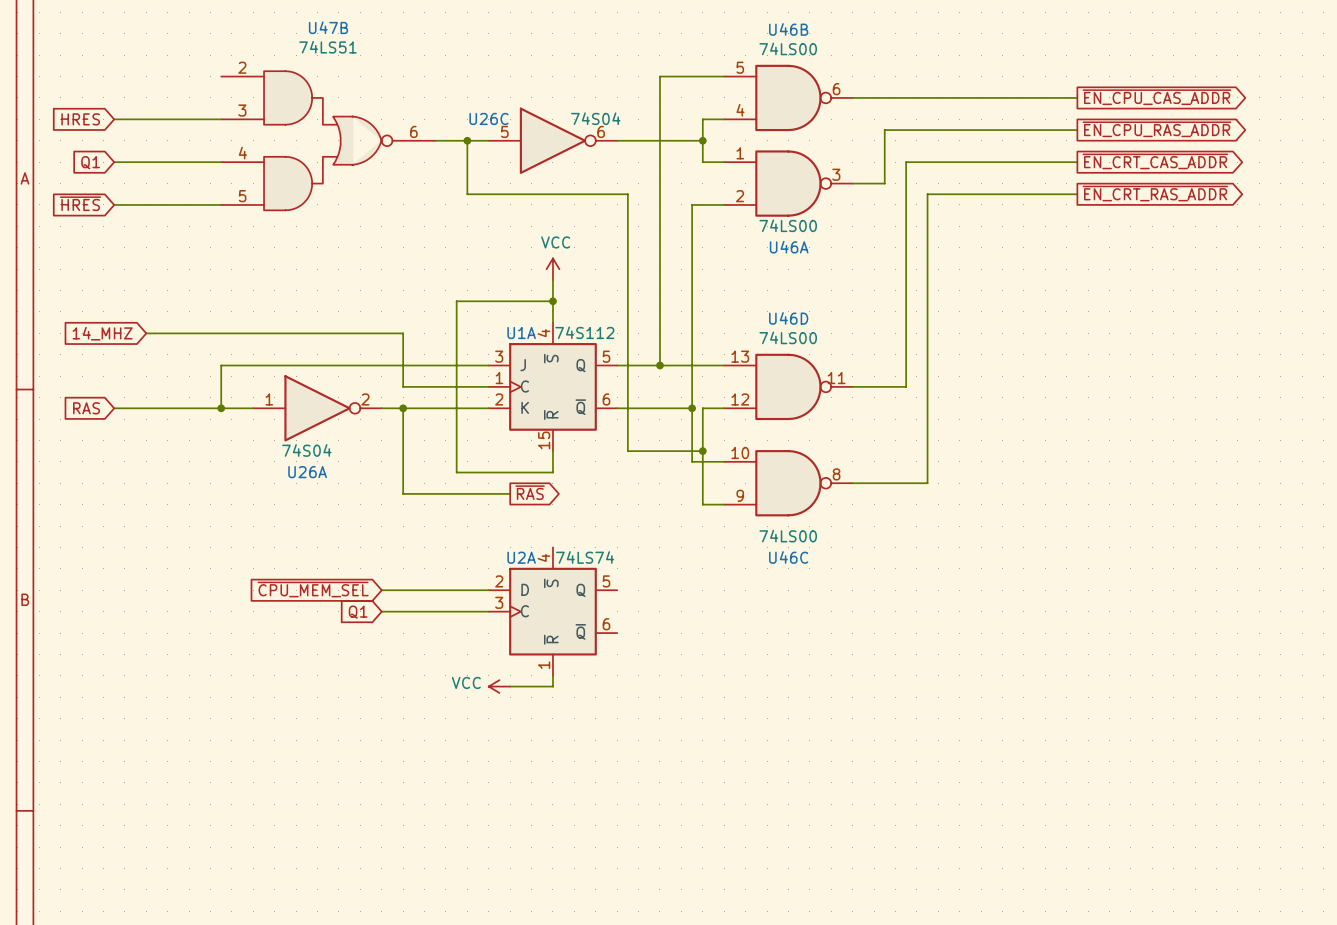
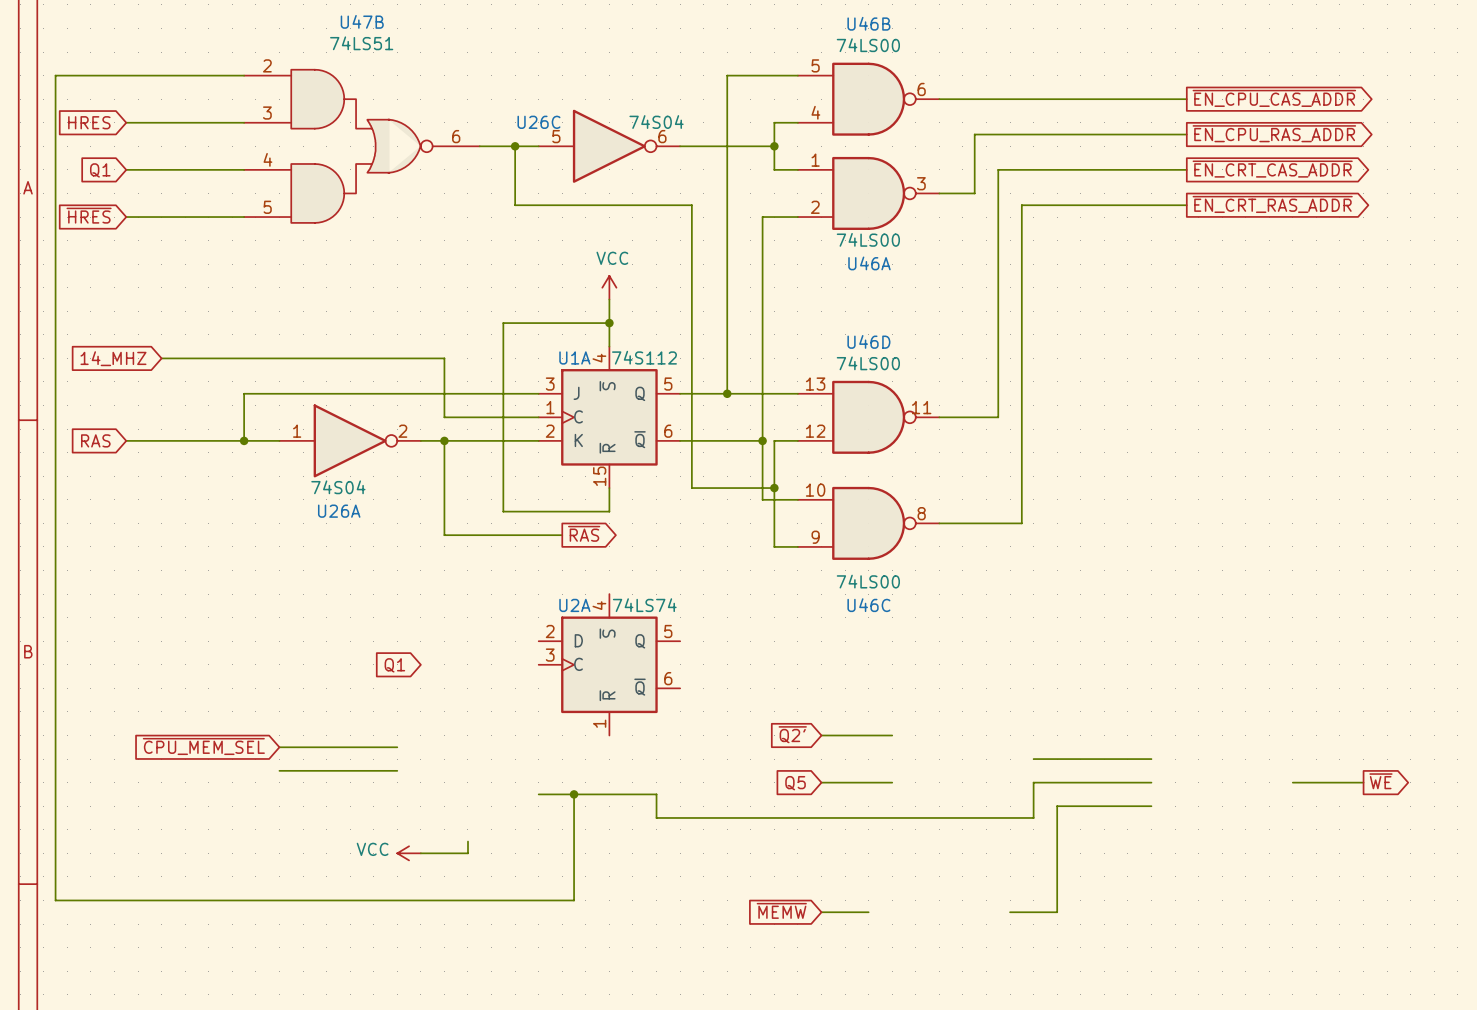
wire: none -> (244, 75) (55, 75) (55, 900) (574, 900) (574, 794)
global label position: ~{CPU_MEM_SEL} (313, 589) -> ~{CPU_MEM_SEL} (203, 746)
wire: (381, 590) (488, 590) -> (279, 747) (397, 747)
wire: (381, 611) (488, 611) -> (279, 770) (397, 770)
wire: (552, 675) (552, 686) (510, 686) -> (467, 841) (467, 853) (420, 853)
global label: none -> ~{Q2'} (792, 734)
wire: none -> (821, 735) (892, 735)
power symbol position: VCC (499, 686) -> VCC (409, 853)
wire: none -> (1033, 759) (1151, 759)
global label: none -> ~{WE} (1380, 781)
wire: none -> (821, 782) (892, 782)
wire: none -> (1151, 782) (1033, 782) (1033, 817) (656, 817) (656, 794) (538, 794)
wire: none -> (1292, 782) (1363, 782)
global label: none -> Q5 (795, 783)
junction: none -> (574, 794)
wire: none -> (1151, 806) (1057, 806) (1057, 912) (1010, 912)
global label: none -> ~{MEMW} (781, 910)
wire: none -> (821, 912) (868, 912)

